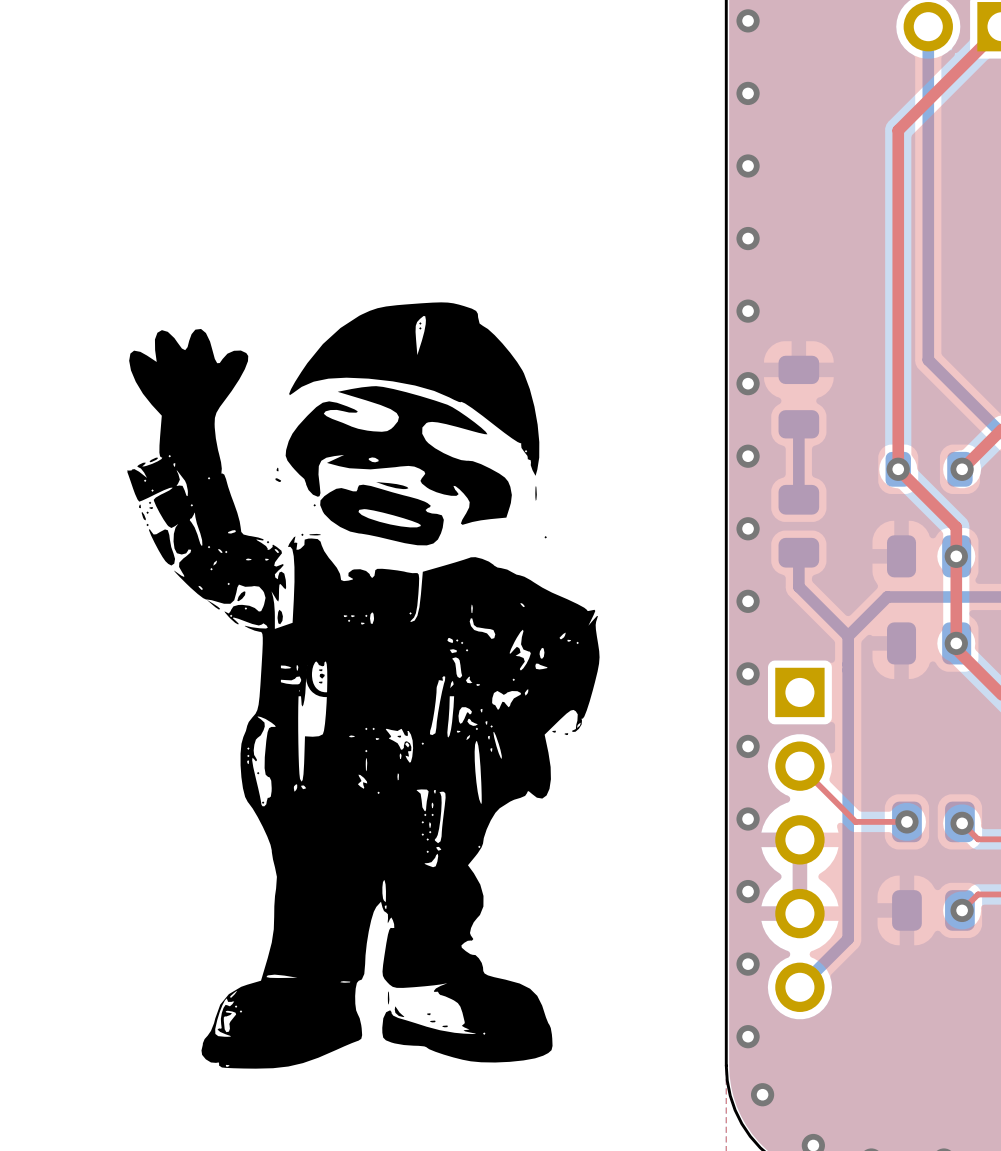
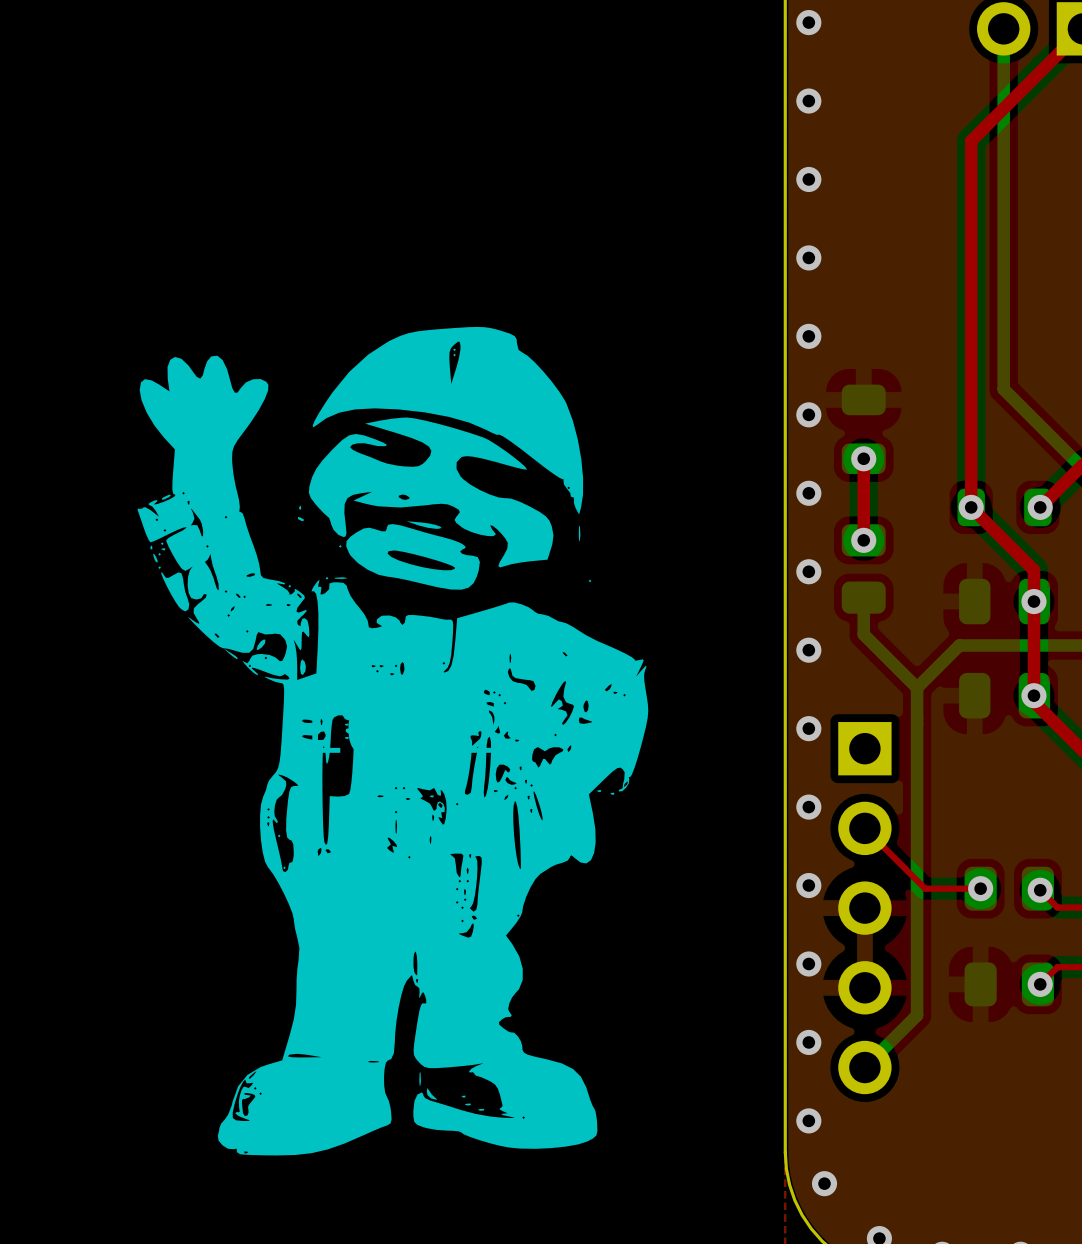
bottom track: (798, 424) (798, 499) -> none
top track: none -> (863, 458) (863, 540)
via: none -> (863, 458)
via: none -> (863, 540)

